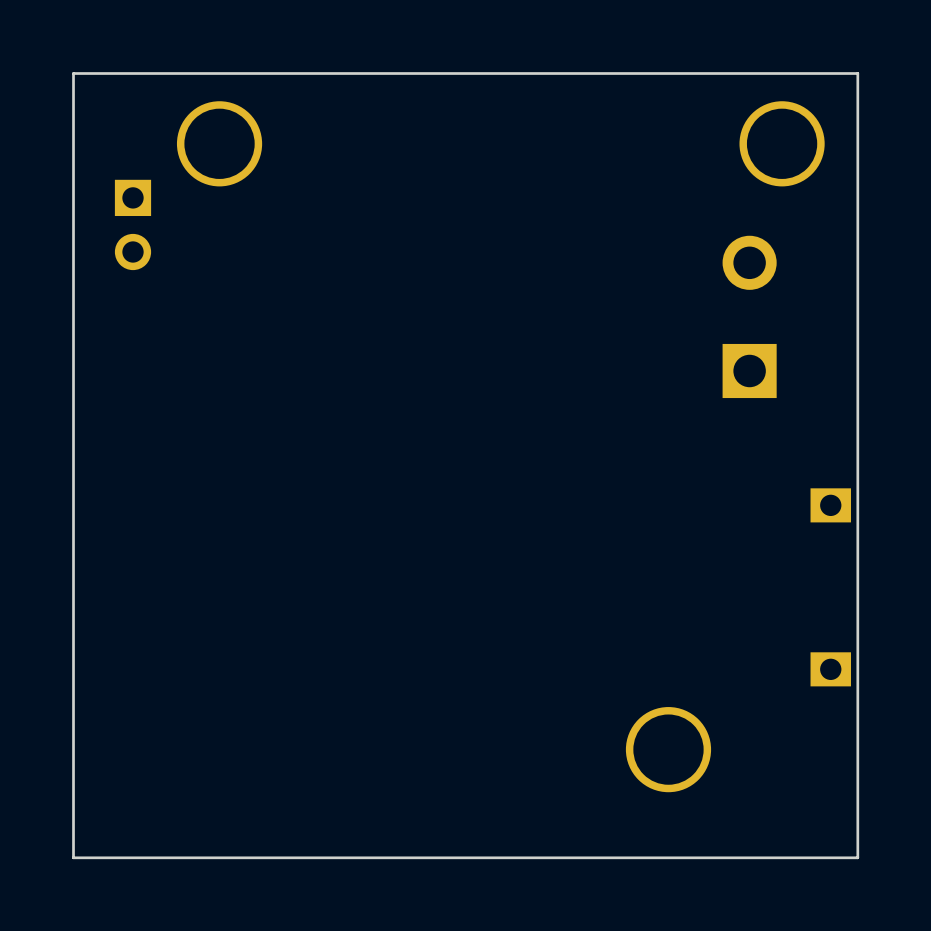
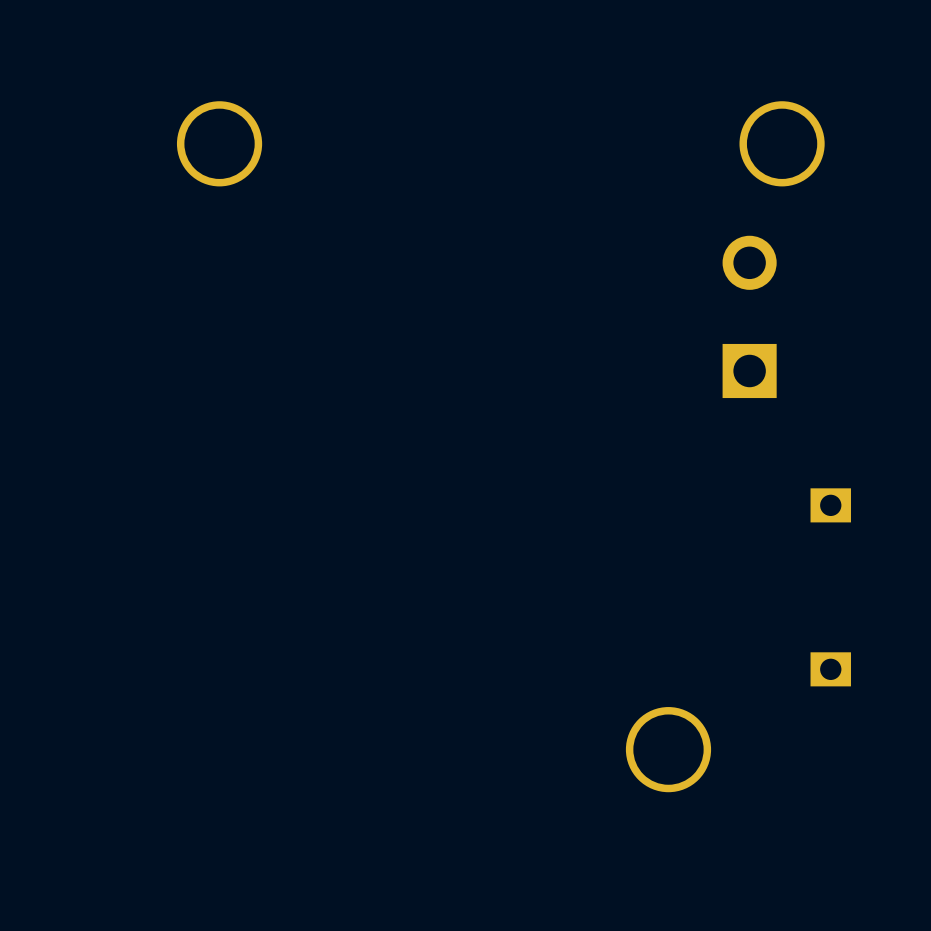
board edge: (857, 73) (73, 73) (73, 857) (857, 857) (857, 73) -> none
part: (133, 224) -> none

